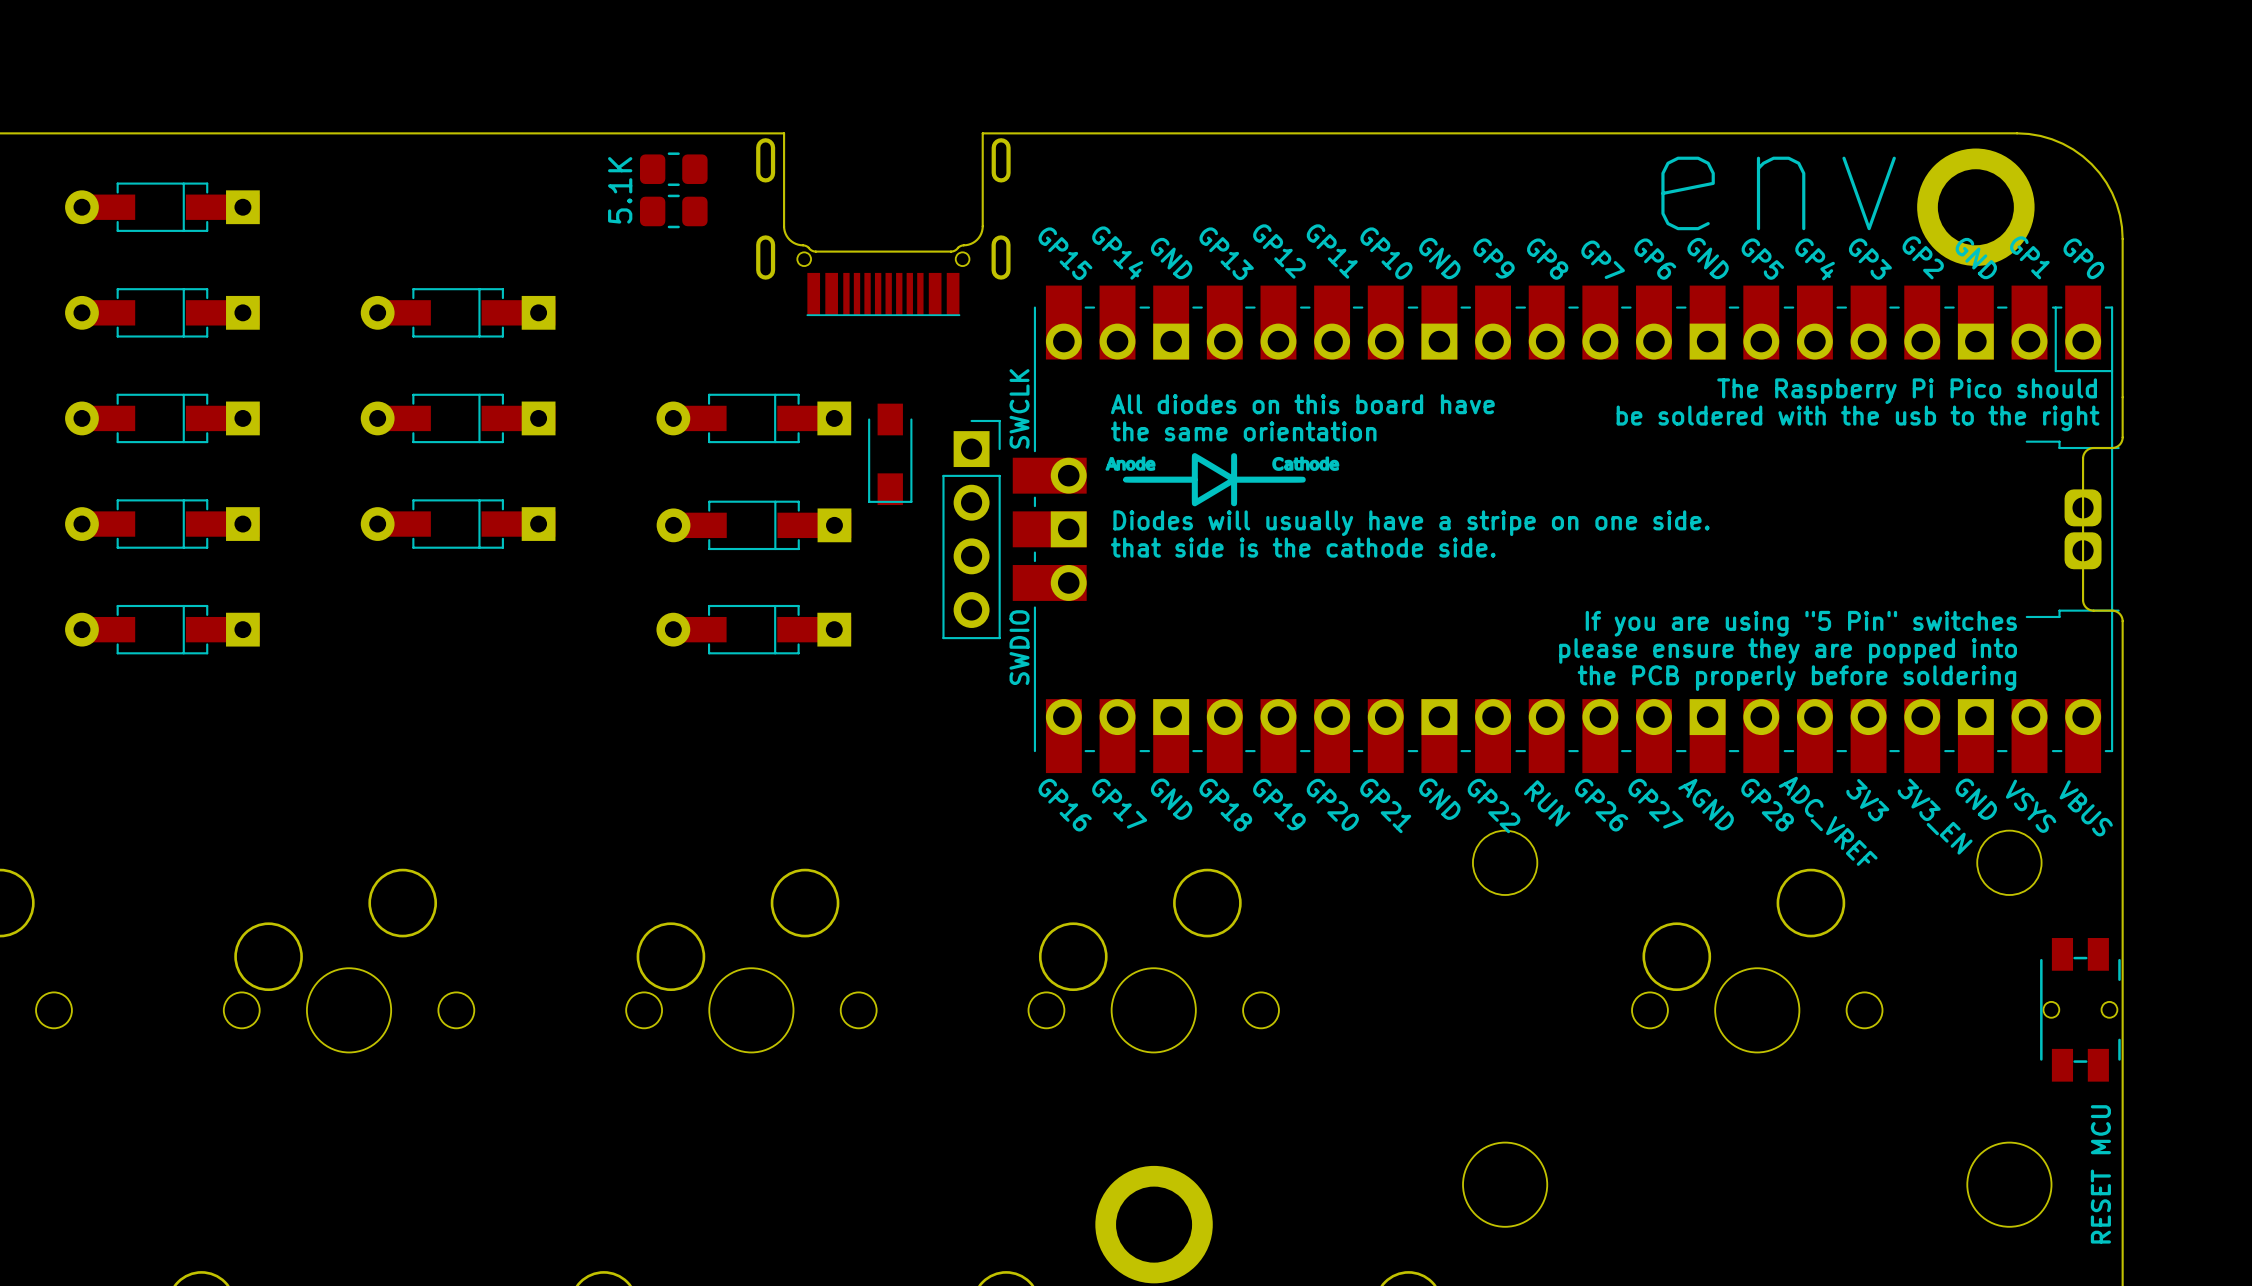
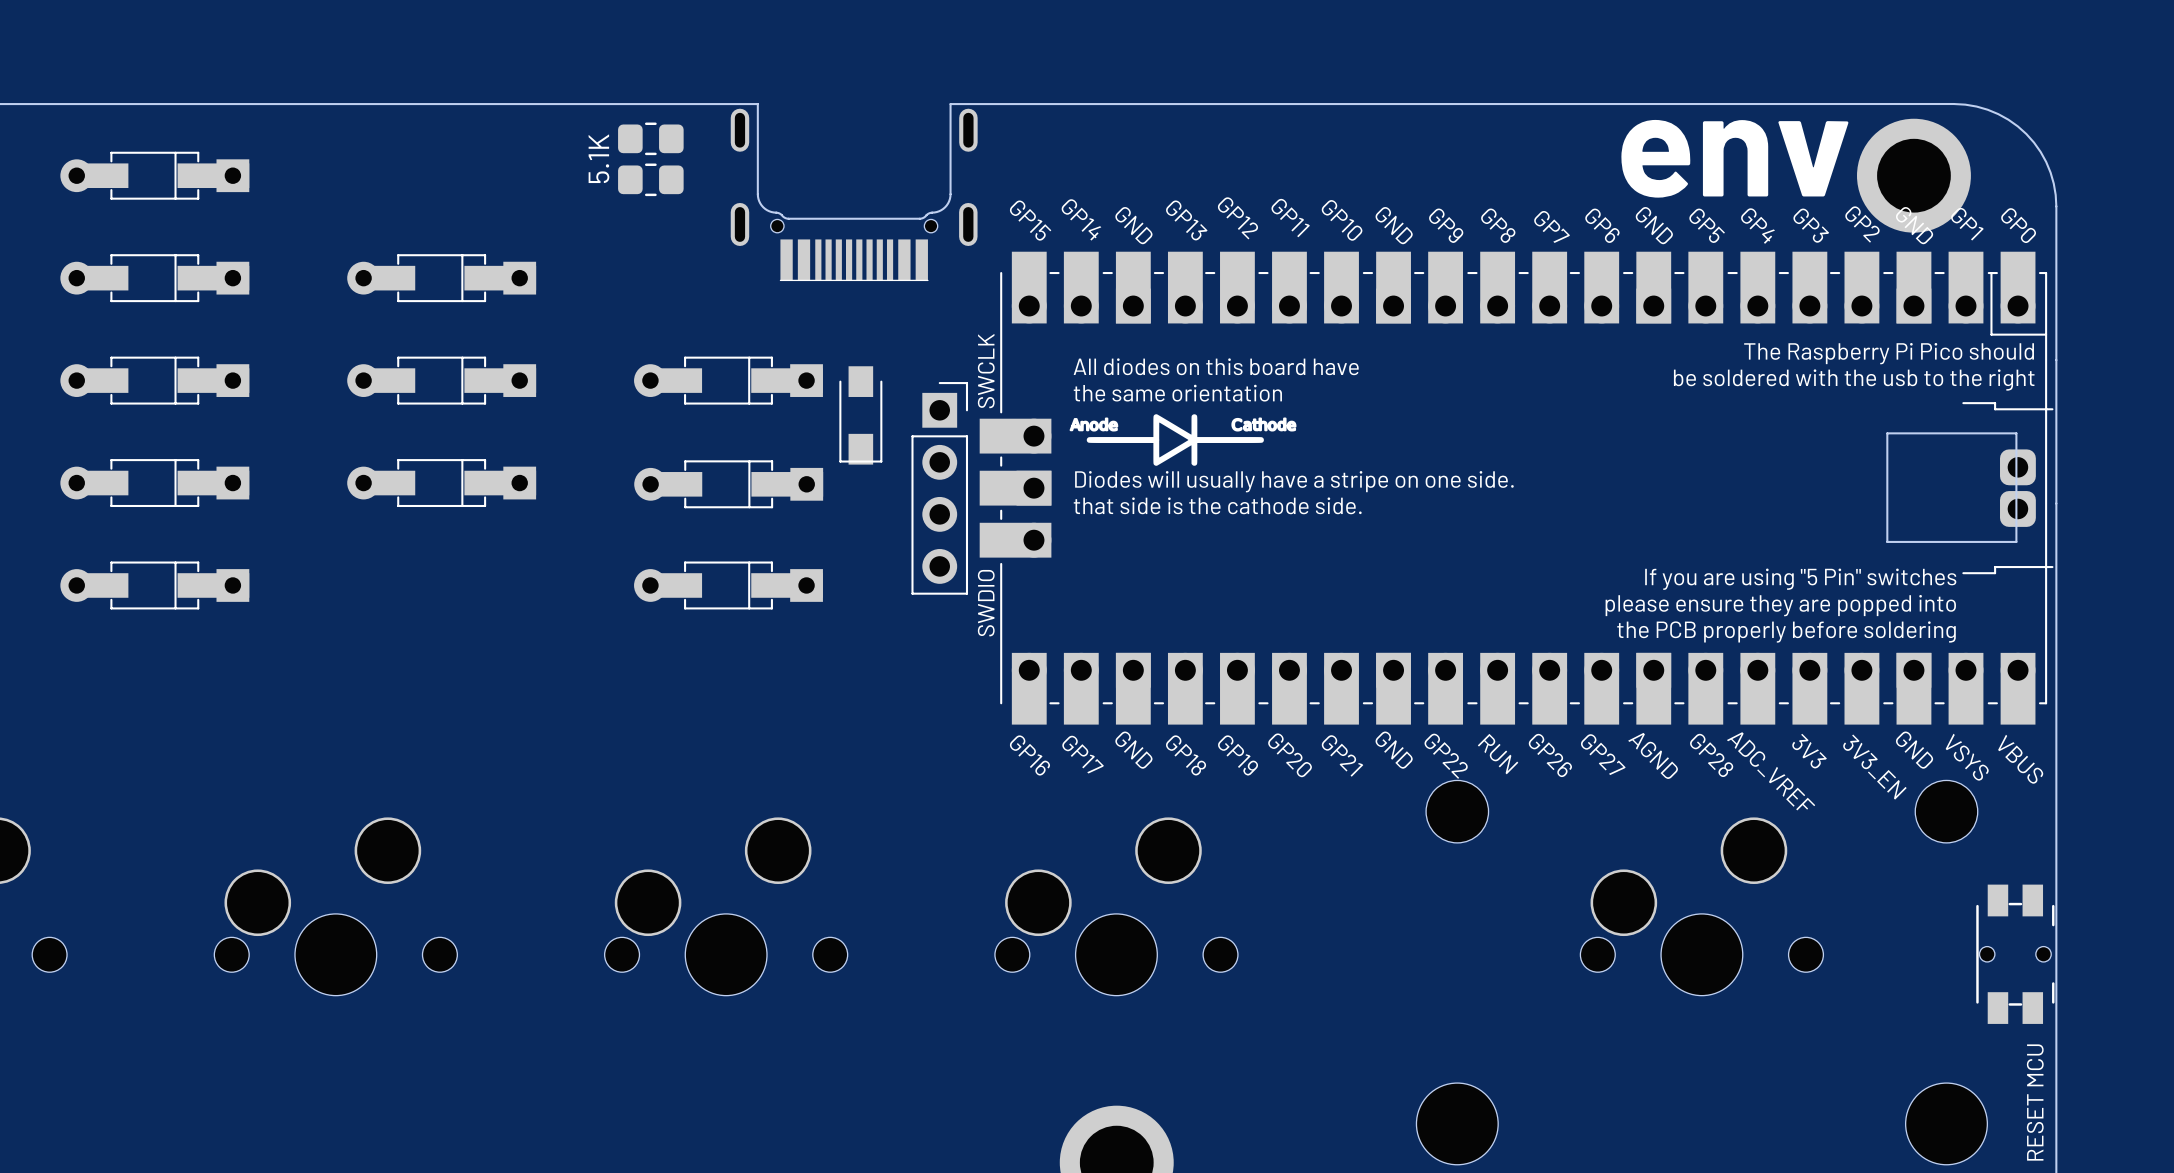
board edge: (2122, 437) (2121, 442) (2116, 447) (2088, 449) (2083, 458) (2083, 602) (2090, 610) (2116, 611) (2120, 614) (2122, 621) -> (2056, 399) (2056, 577)
board edge: none -> (1887, 433) (2016, 433) (2016, 541) (1887, 541) (1887, 433)

